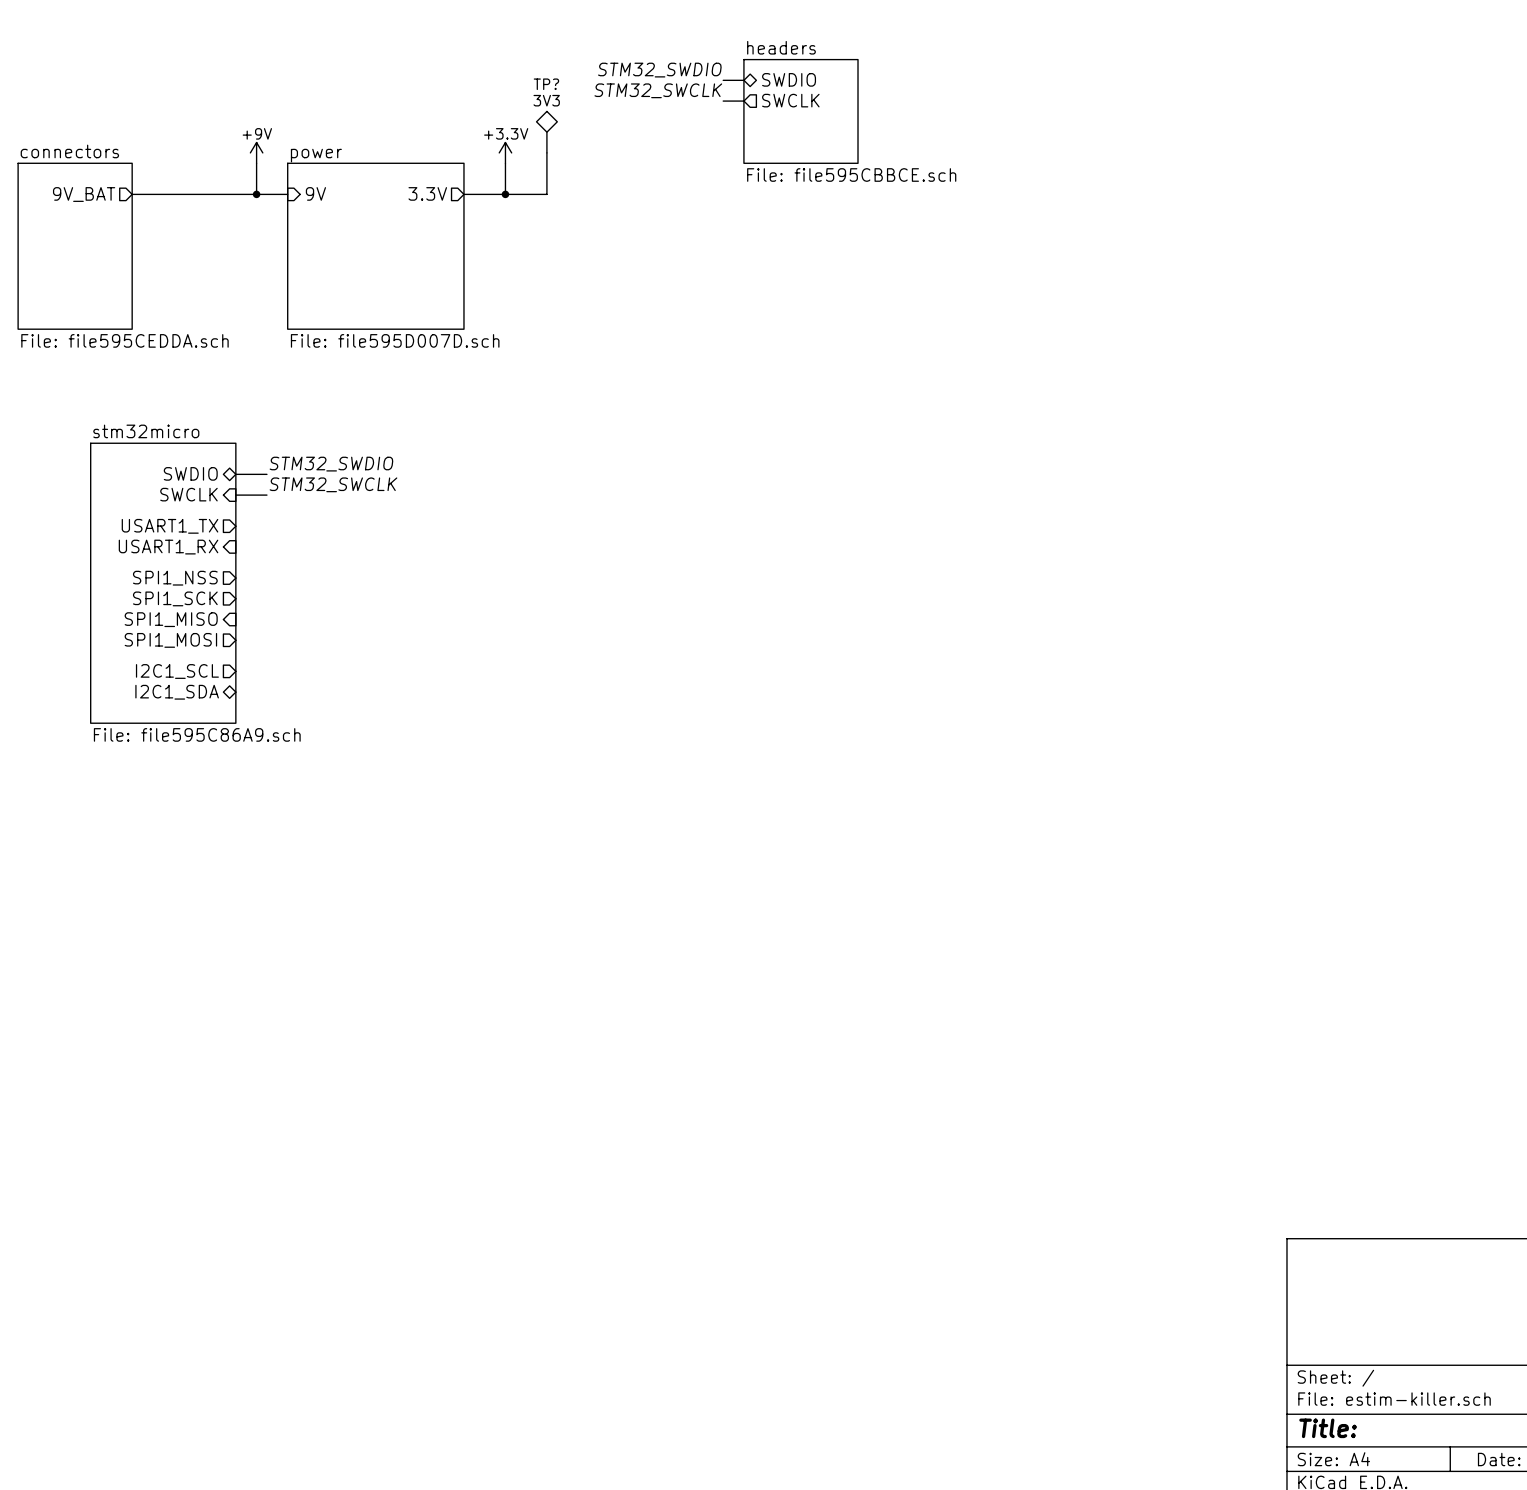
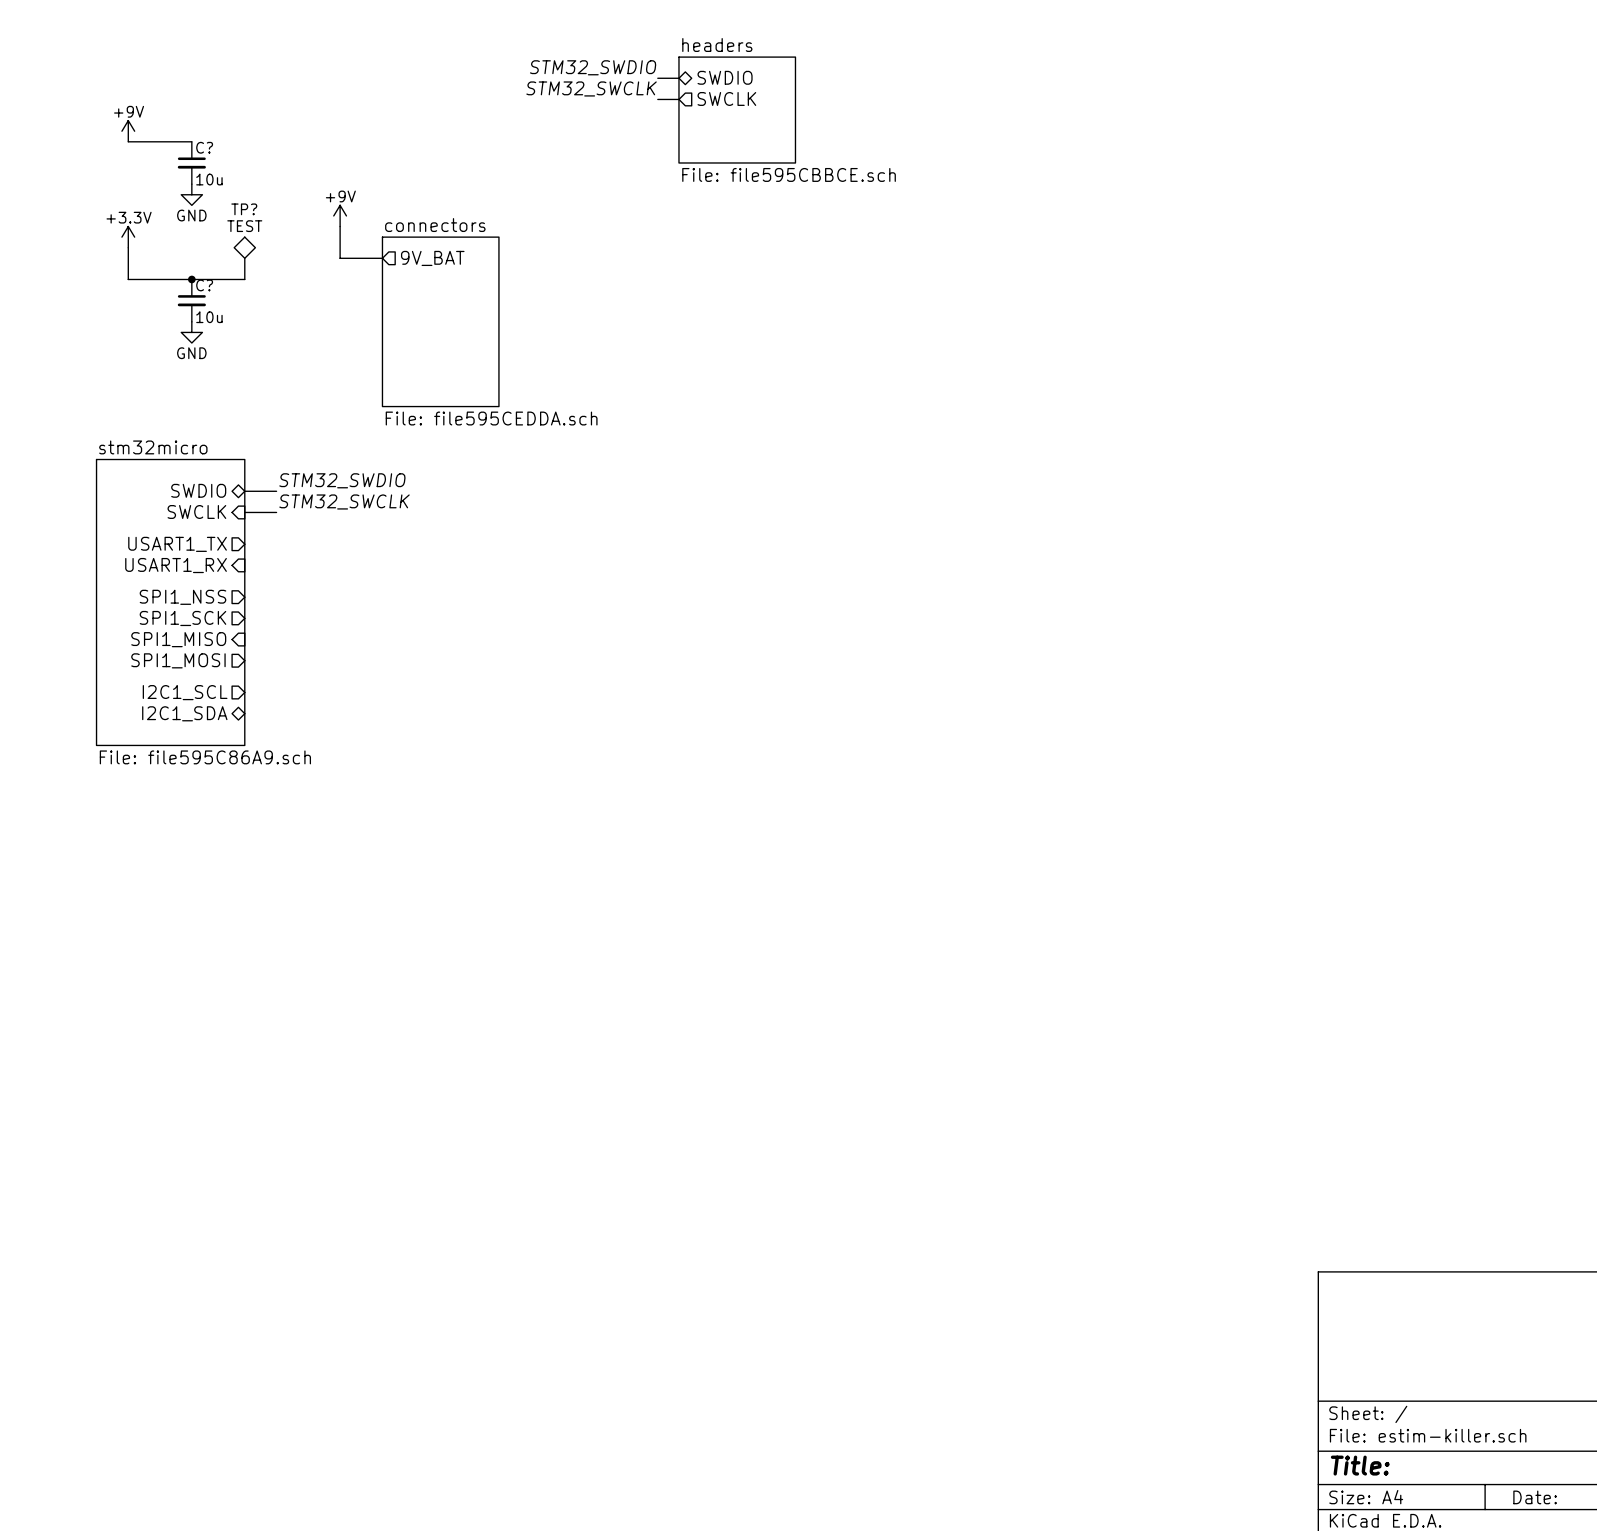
label position: STM32_SWDIO (659, 70) -> STM32_SWDIO (593, 67)
sheet pin position: SWDIO (789, 79) -> SWDIO (725, 77)
wire: (723, 80) (743, 80) -> (657, 78) (678, 78)
label position: STM32_SWCLK (658, 90) -> STM32_SWCLK (591, 88)
sheet pin position: SWCLK (790, 100) -> SWCLK (726, 98)
wire: (723, 101) (743, 101) -> (657, 99) (678, 99)
sheet headers position: (800, 111) -> (737, 110)
power symbol: none -> +9V (128, 131)
wire: none -> (128, 141) (191, 141)
TP?: 3V3 (546, 132) -> none
C?: none -> 10u (191, 162)
power symbol: +9V (256, 152) -> none
power symbol: +3.3V (505, 152) -> none
wire: (546, 152) (546, 194) (463, 194) -> none
wire: (256, 163) (256, 194) -> none
wire: (505, 163) (505, 194) -> none
power symbol: none -> GND (191, 194)
sheet pin: 9V (315, 193) -> none
sheet pin: 3.3V (427, 193) -> none
sheet pin: 9V_BAT (84, 194) -> none
wire: (132, 194) (287, 194) -> none
junction: (256, 194) -> none
junction: (505, 194) -> none
power symbol: none -> +9V (340, 215)
wire: none -> (340, 226) (340, 258) (382, 258)
power symbol: none -> +3.3V (128, 237)
wire: none -> (128, 247) (128, 279) (244, 279)
sheet connectors: File: file595CEDDA.sch (75, 246) -> none
TP?: none -> TEST (244, 258)
sheet power: File: file595D007D.sch (375, 246) -> none
sheet pin: none -> 9V_BAT (432, 258)
junction: none -> (191, 279)
C?: none -> 10u (191, 300)
sheet connectors: none -> File: file595CEDDA.sch (440, 321)
power symbol: none -> GND (191, 332)

